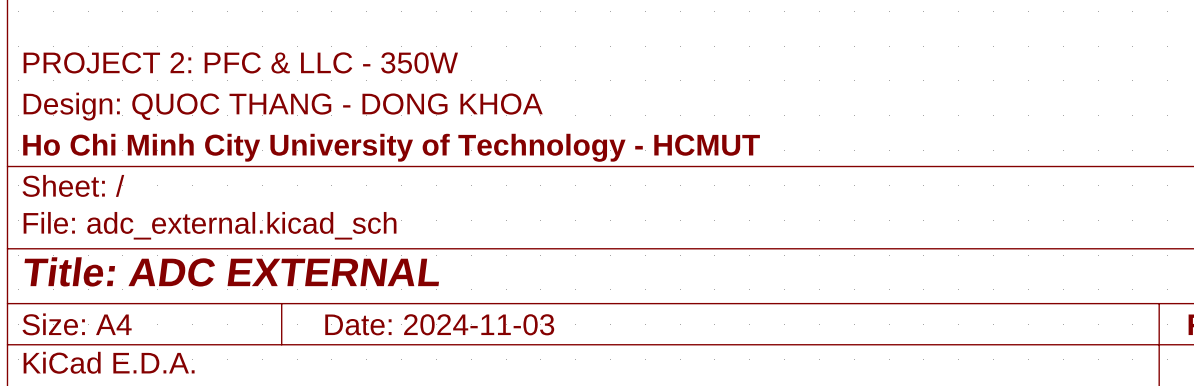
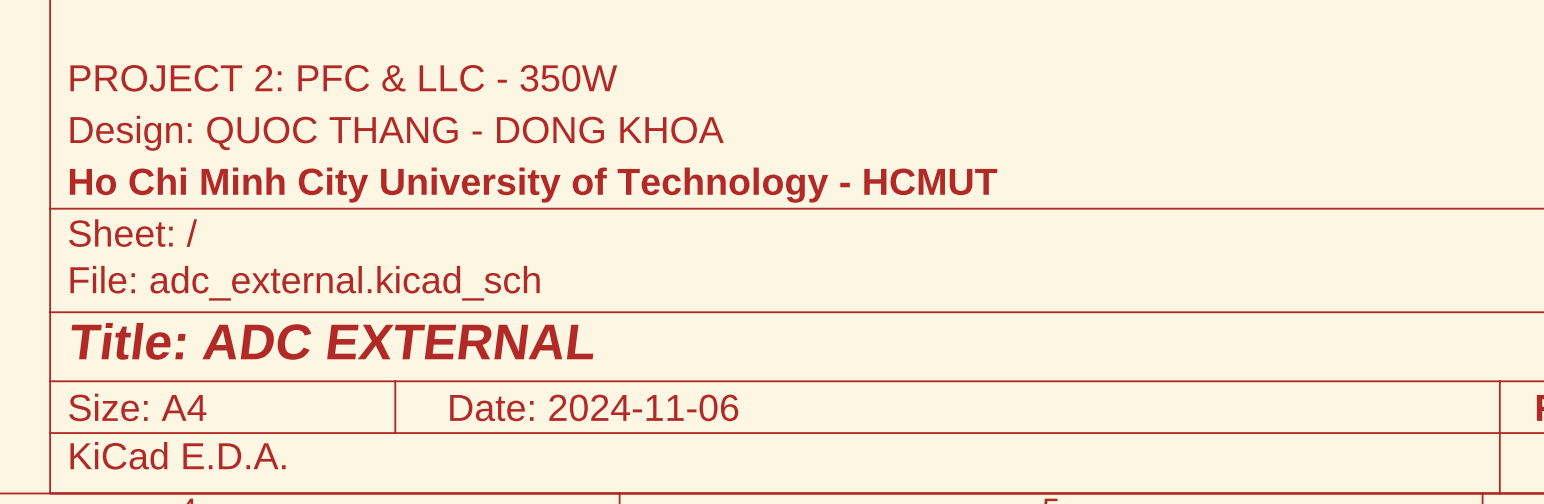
title block: Date: 2024-11-03 (439, 324) -> Date: 2024-11-06 (594, 407)

